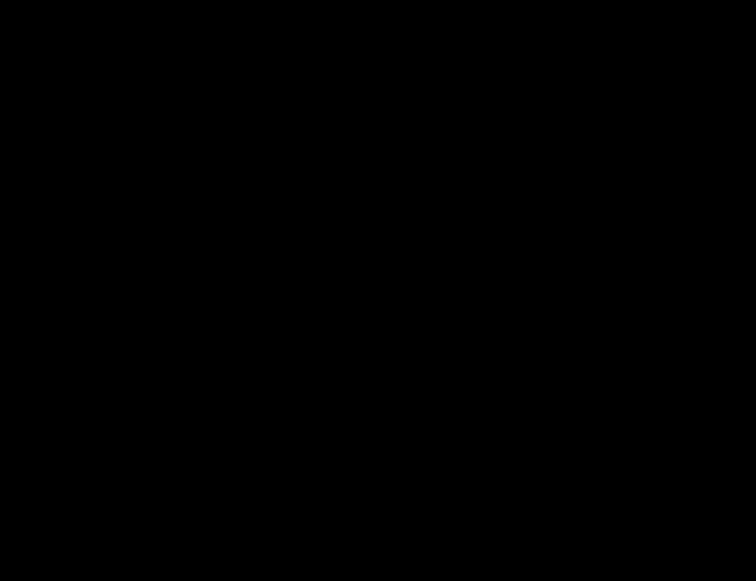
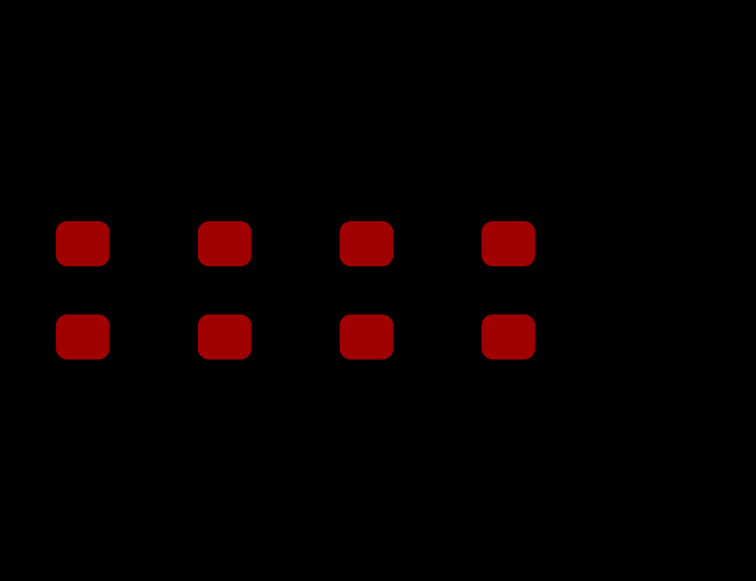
part: none -> (82, 290)
part: none -> (224, 290)
part: none -> (366, 290)
part: none -> (508, 290)

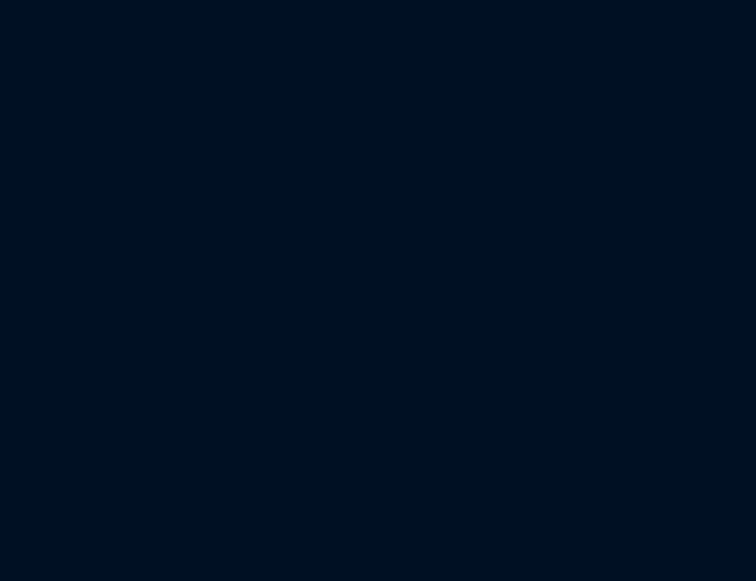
part: (82, 290) -> none
part: (224, 290) -> none
part: (366, 290) -> none
part: (508, 290) -> none

